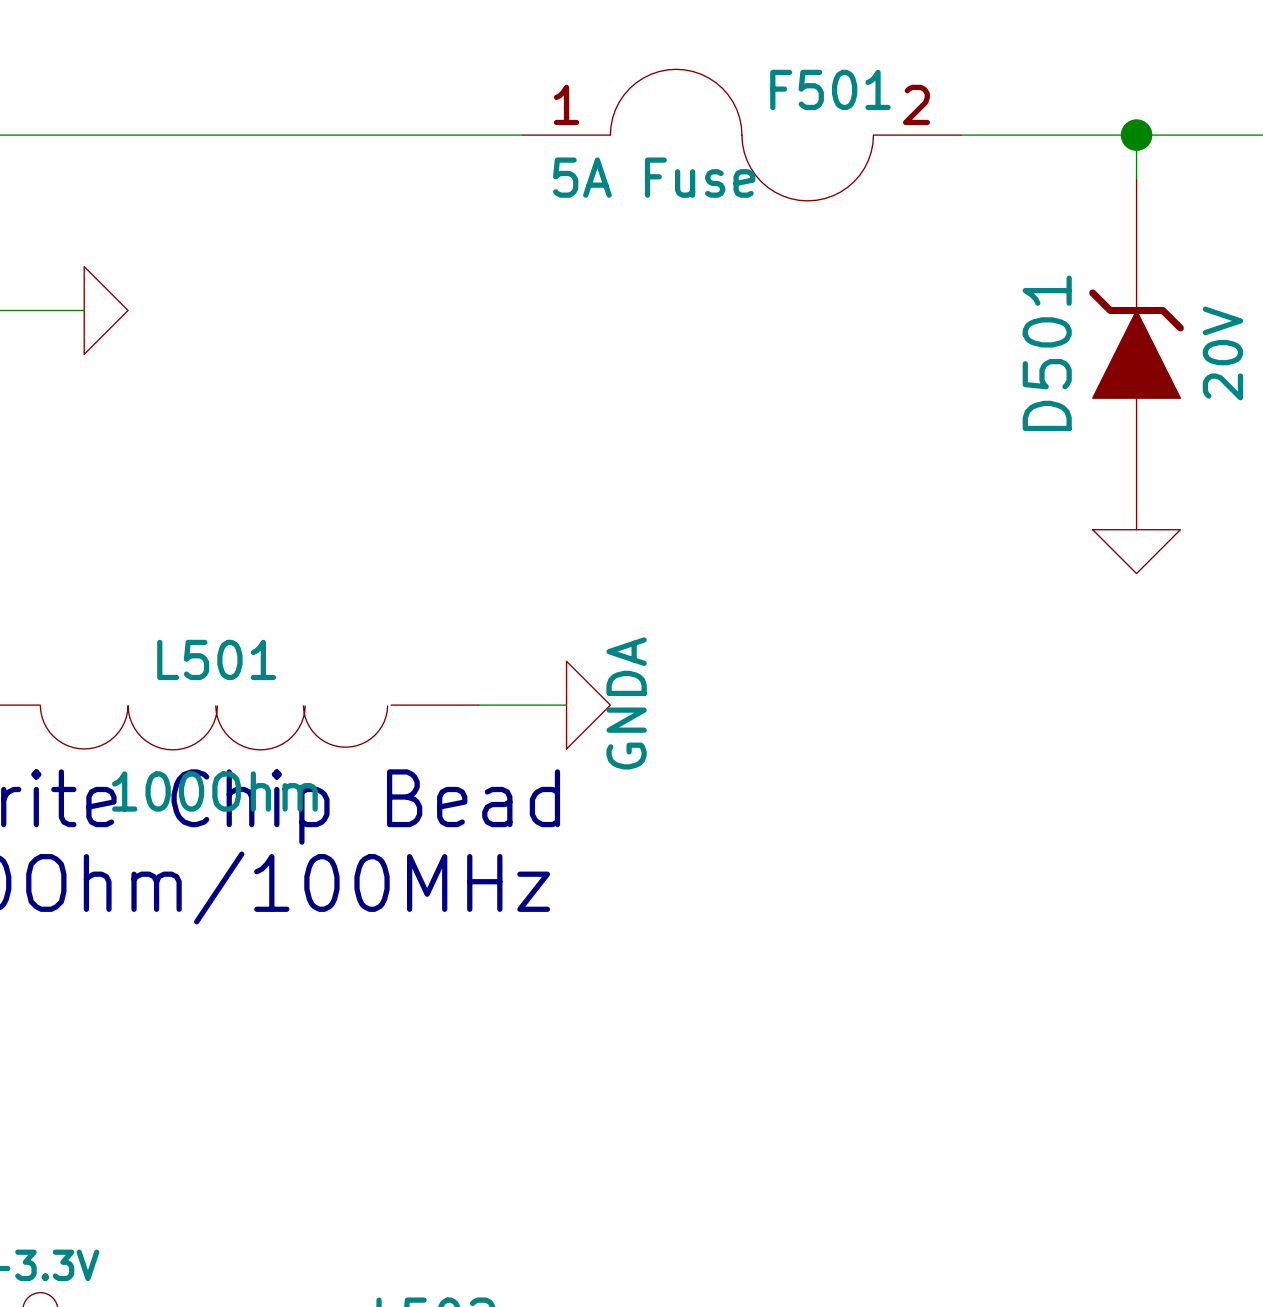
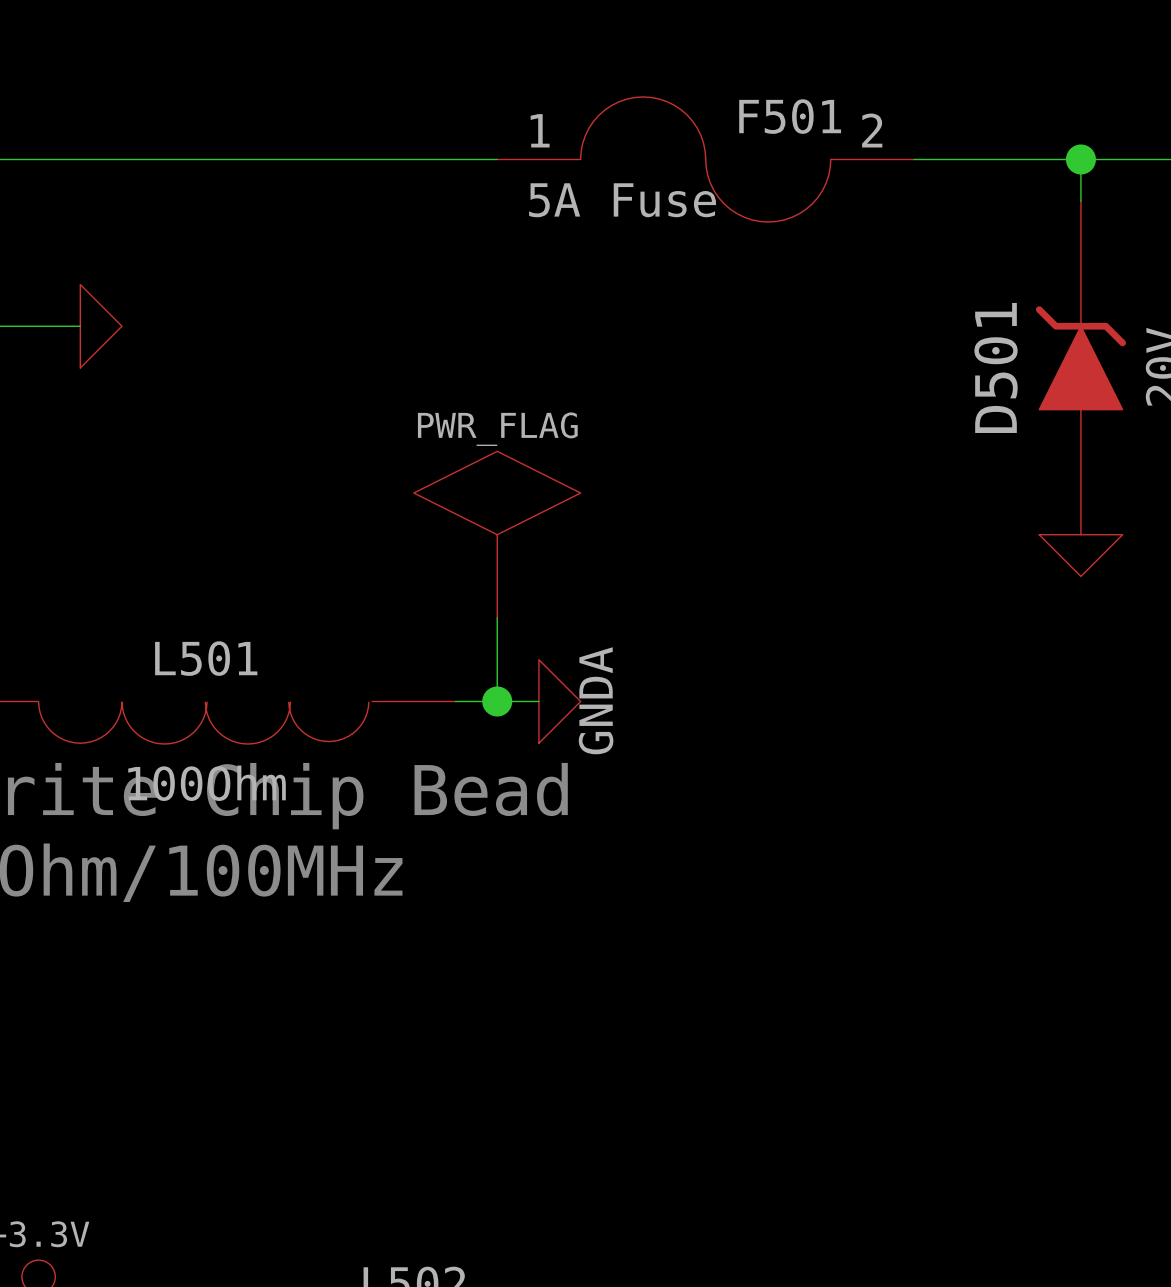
power symbol: none -> PWR_FLAG (497, 534)
wire: none -> (497, 618) (497, 701)
junction: none -> (497, 701)

